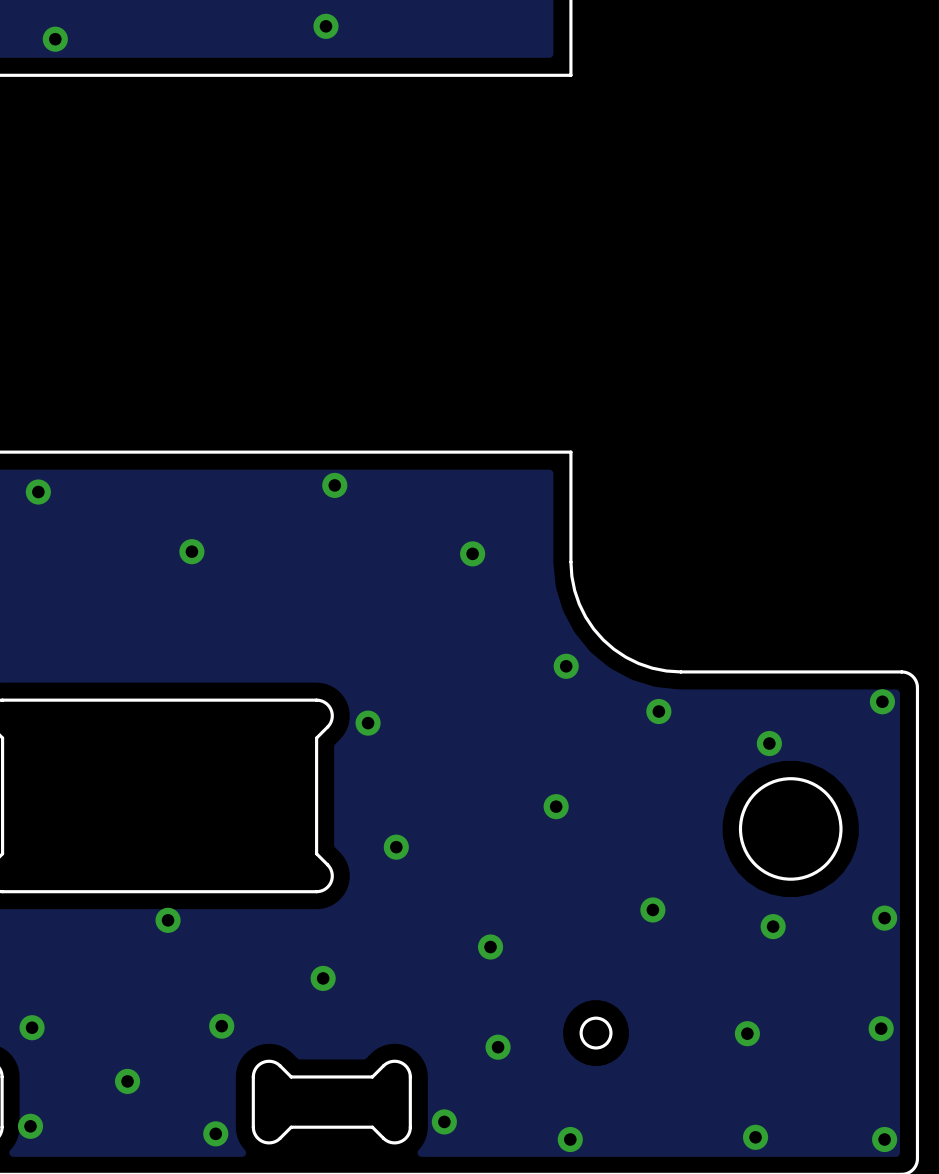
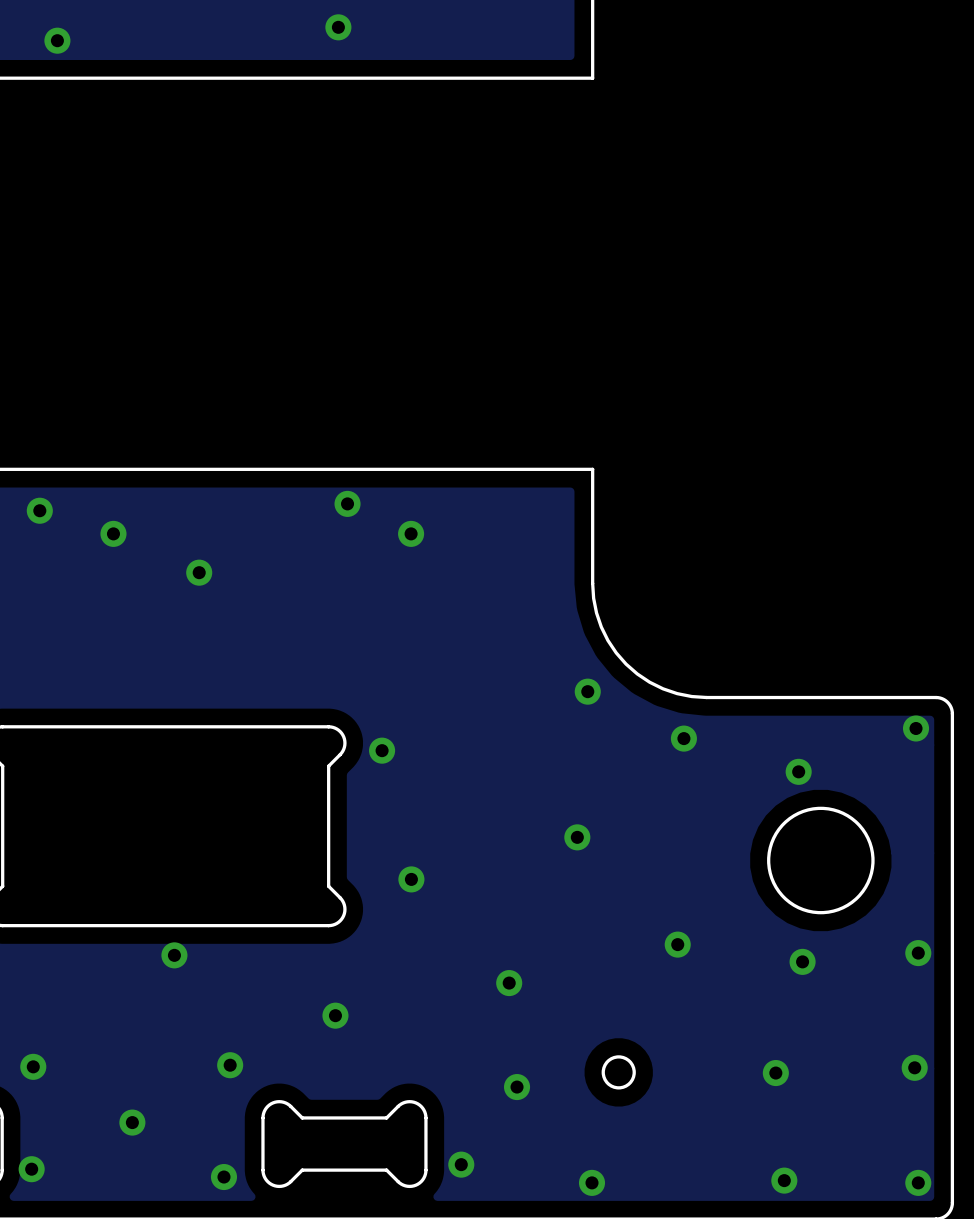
via: none -> (113, 533)
via position: (472, 553) -> (411, 533)

